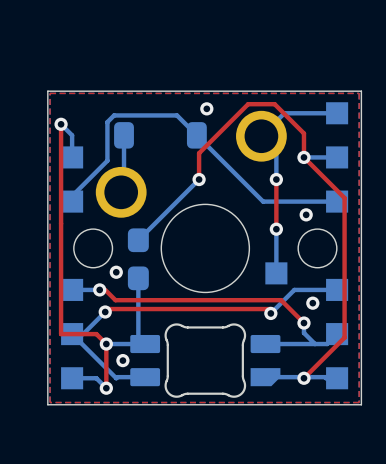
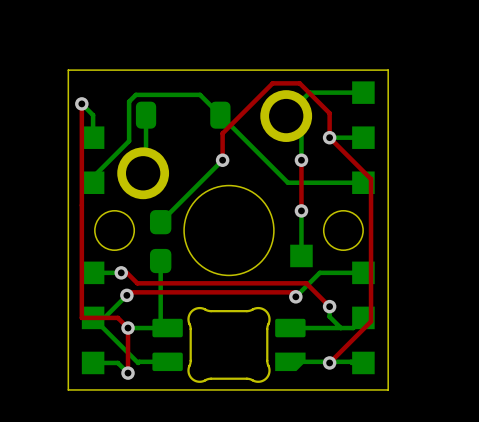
top zone outline: (50, 93) (359, 93) (359, 402) (50, 402) (50, 93) -> none
via: (206, 108) -> none
via: (306, 214) -> none
via: (116, 272) -> none
via: (312, 303) -> none
via: (122, 360) -> none

